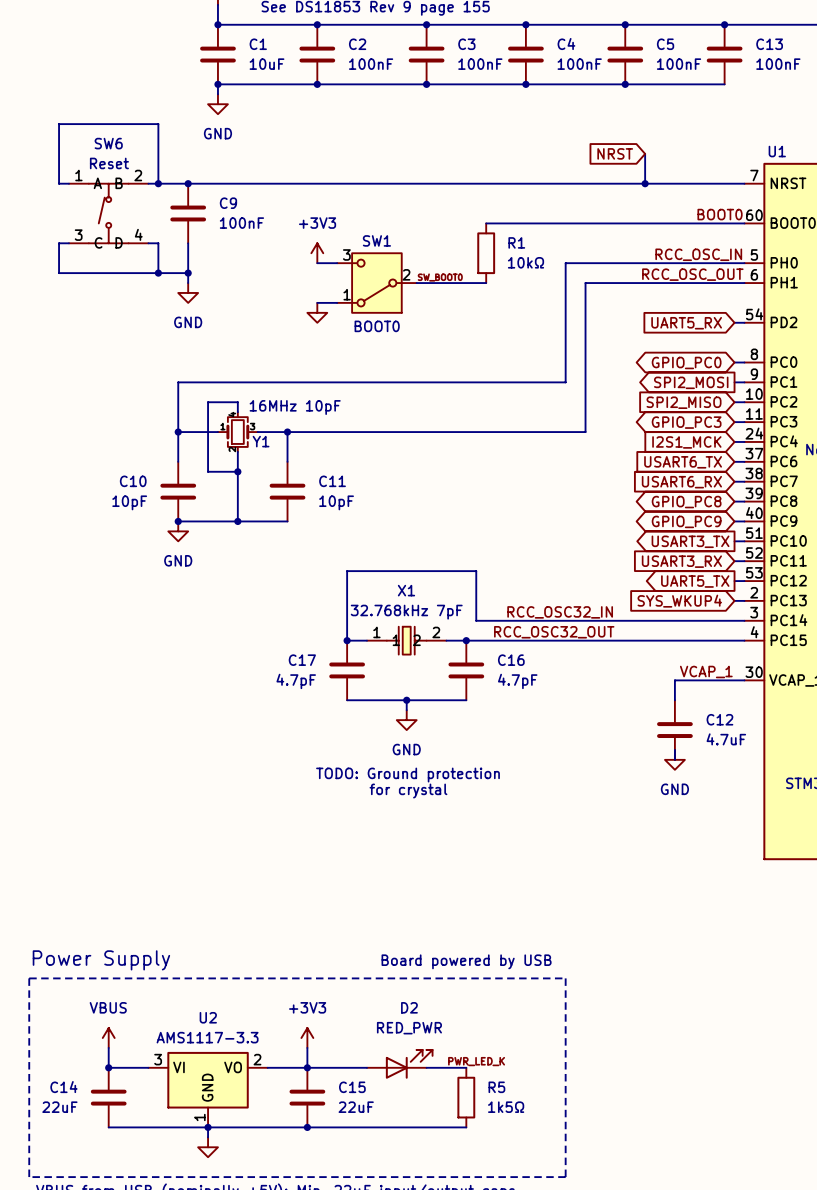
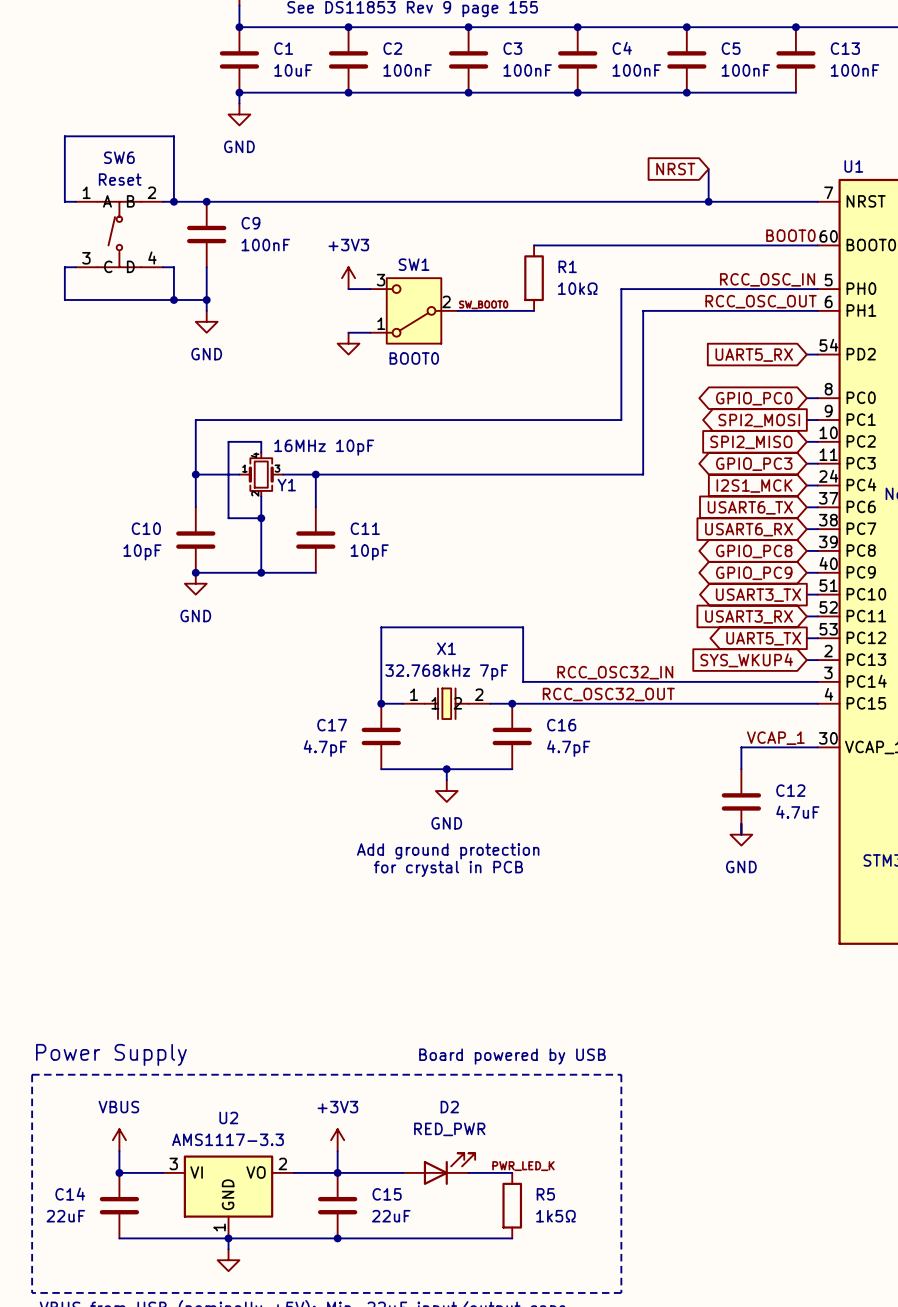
text: TODO: Ground protection (408, 775) -> Add ground protection (448, 851)
text: for crystal (408, 791) -> for crystal in PCB (448, 868)

